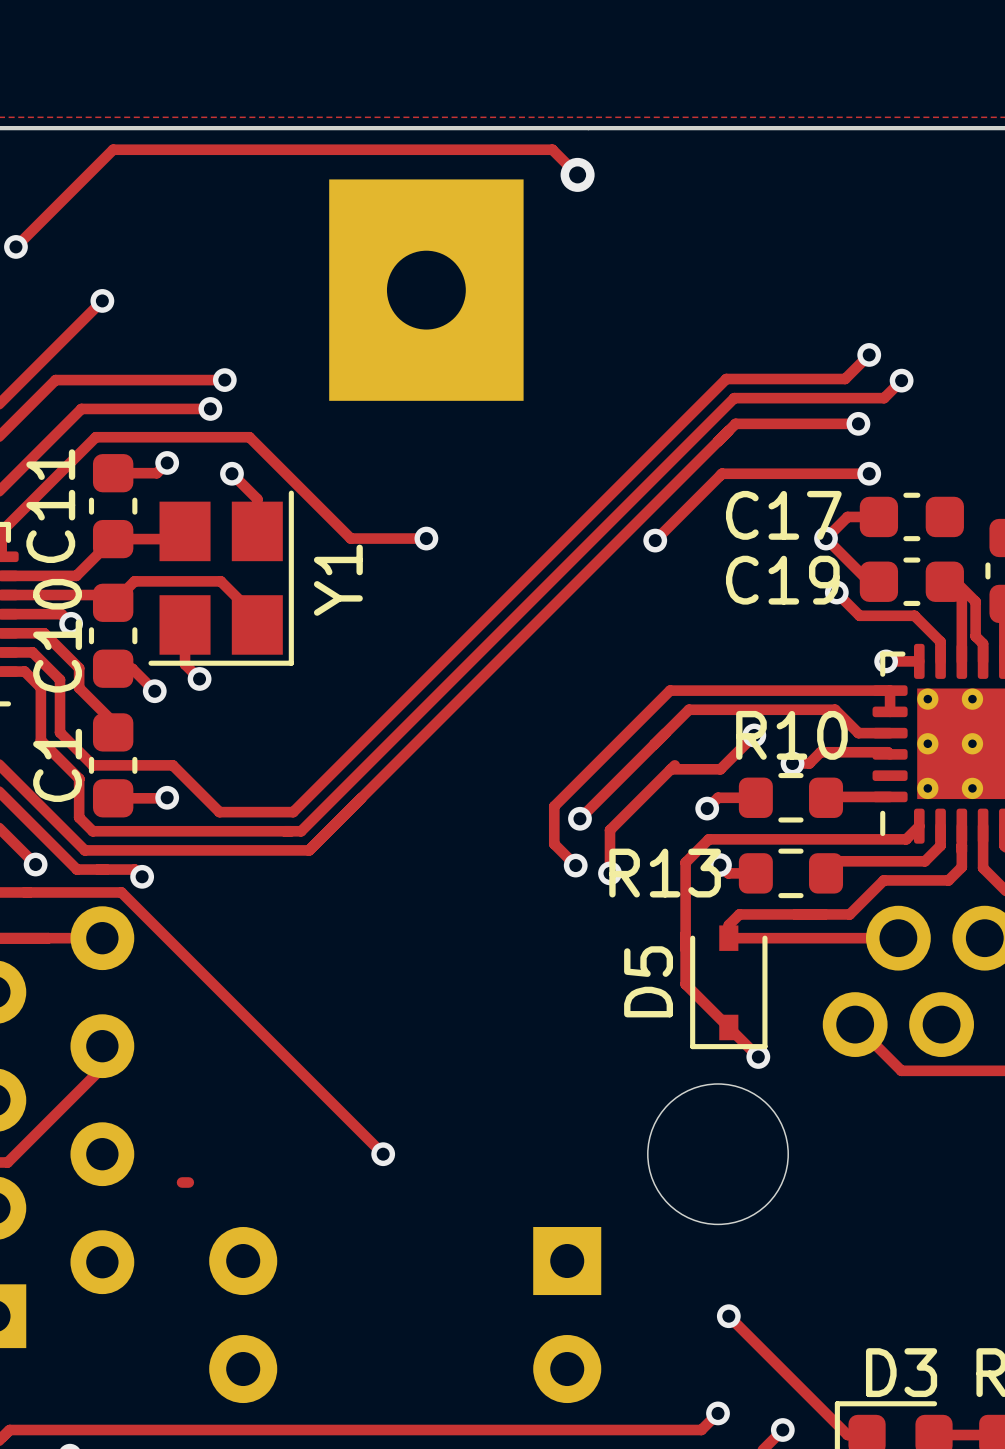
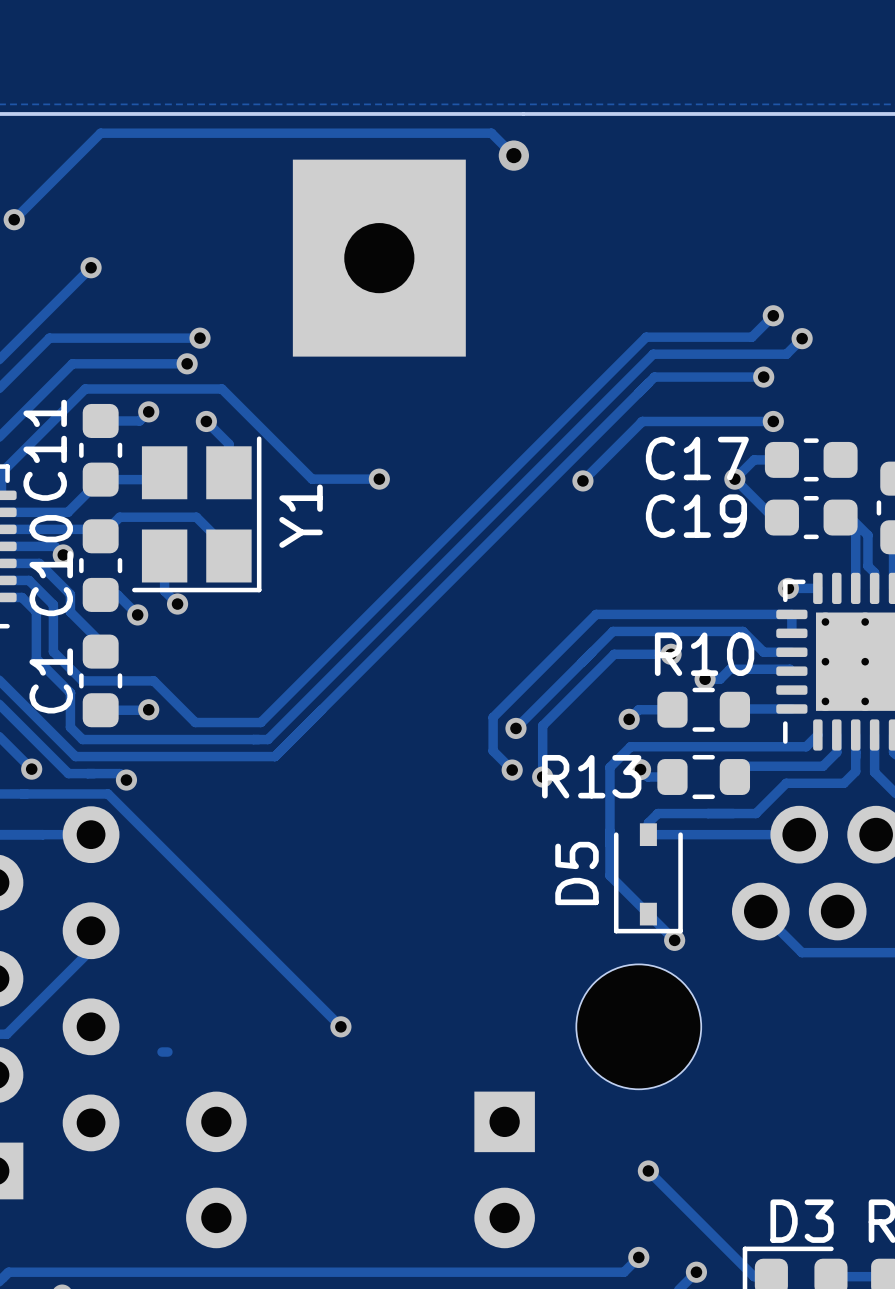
track: (836, 592) (859, 615) (914, 615) (940, 641) (940, 661) -> none
via: (836, 592) -> none
track: (754, 735) (720, 769) (670, 769) -> none
track: (674, 765) (610, 830) -> (671, 654) (614, 654) (542, 725) (542, 738)

